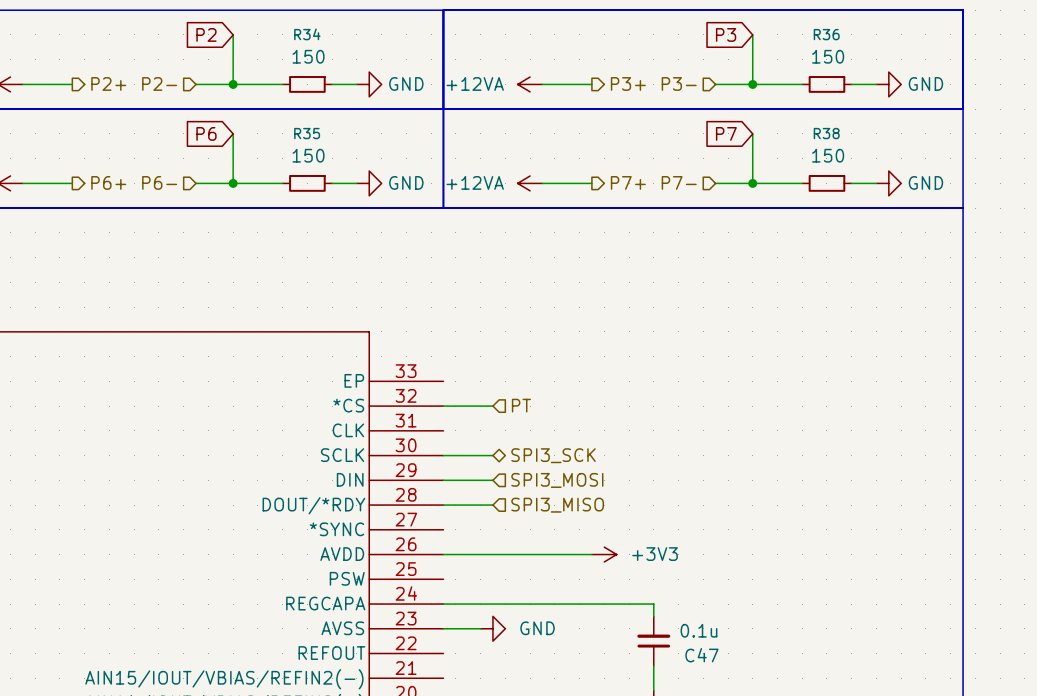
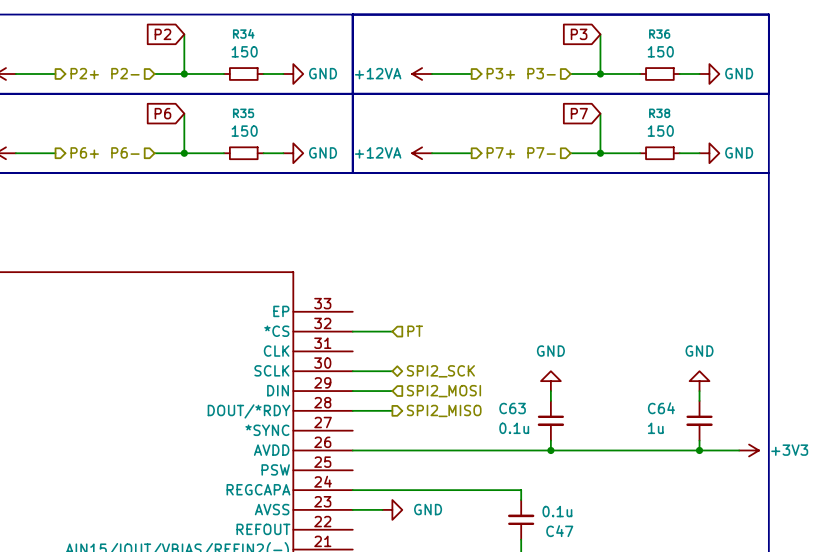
hierarchical label: SPI3_SCK (553, 455) -> SPI2_SCK (440, 371)
power symbol: none -> GND (550, 381)
power symbol: none -> GND (699, 381)
hierarchical label: SPI3_MOSI (557, 480) -> SPI2_MOSI (443, 391)
wire: none -> (550, 391) (550, 400)
wire: none -> (699, 391) (699, 400)
hierarchical label shape: input (557, 505) -> output (444, 410)
hierarchical label: SPI3_MISO (557, 505) -> SPI2_MISO (444, 410)
C63: none -> 0.1u (550, 420)
C64: none -> 1u (699, 420)
wire: none -> (550, 440) (550, 450)
wire: none -> (699, 440) (699, 450)
wire: none -> (471, 450) (739, 450)
power symbol: +3V3 (604, 554) -> none
junction: none -> (550, 450)
junction: none -> (699, 450)
power symbol: none -> +3V3 (749, 450)

